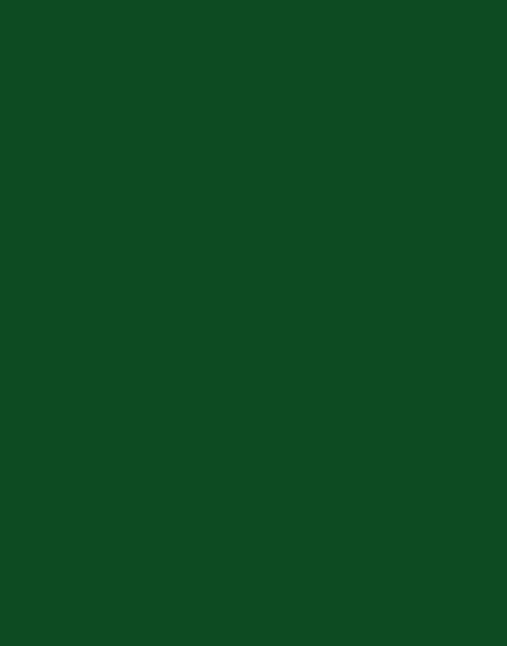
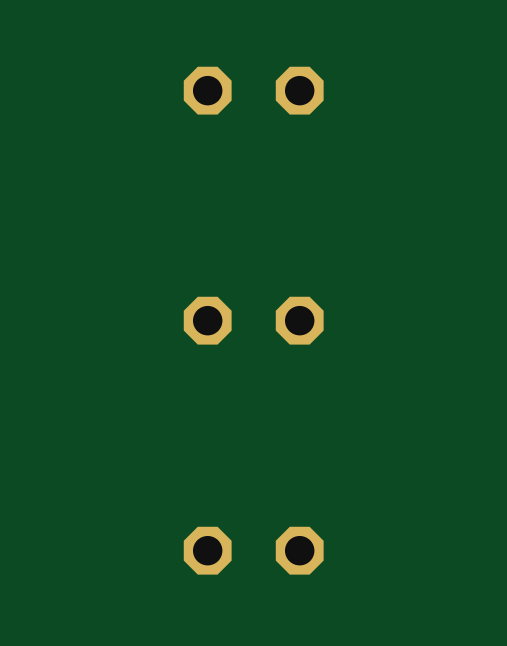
part: none -> (253, 90)
part: none -> (253, 320)
part: none -> (253, 550)

